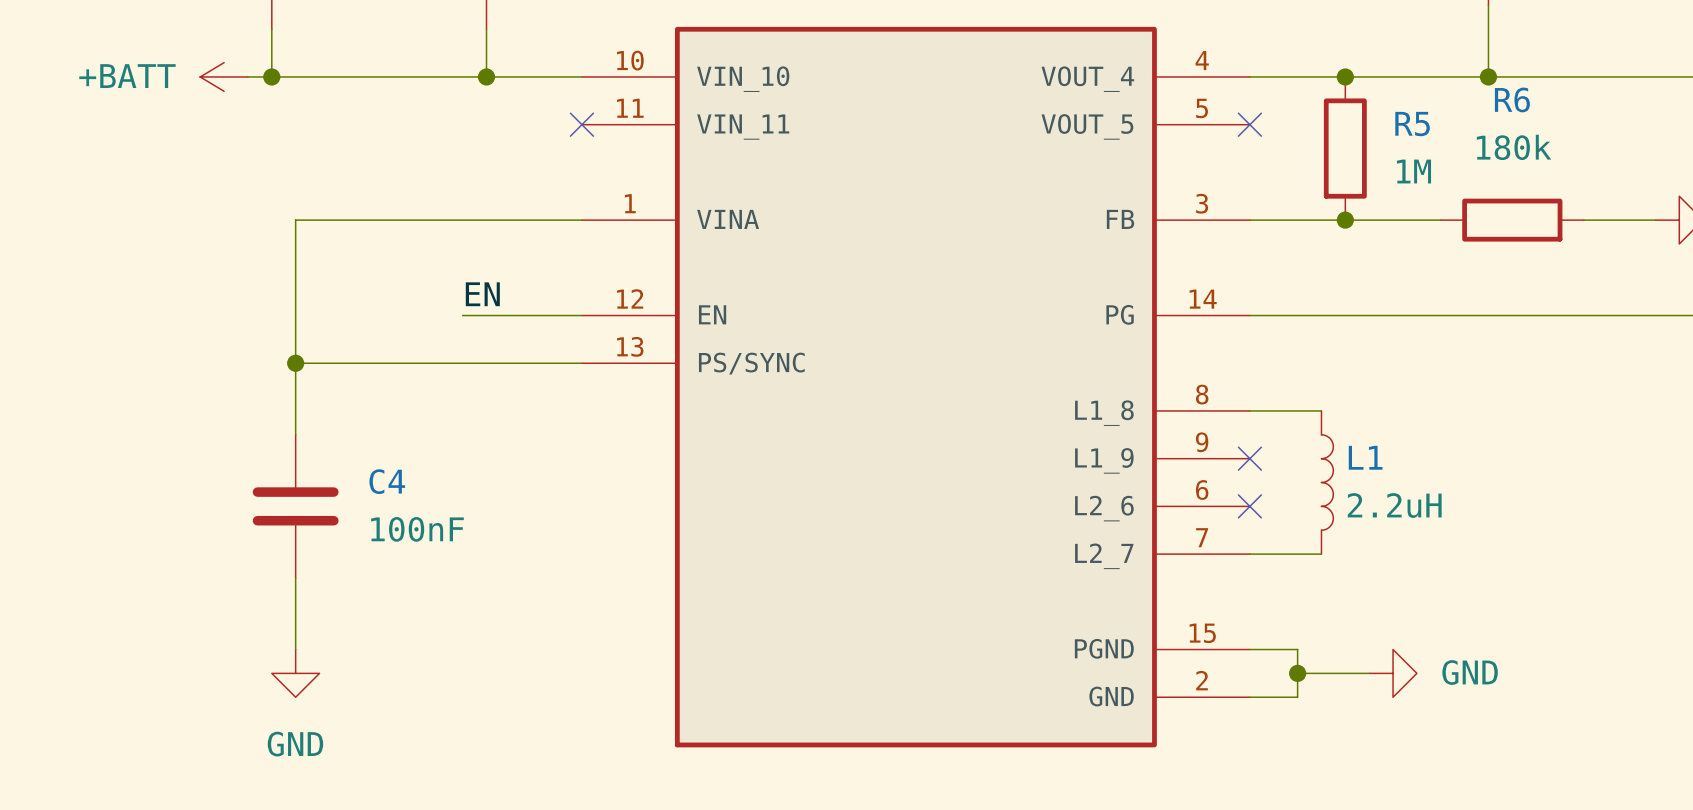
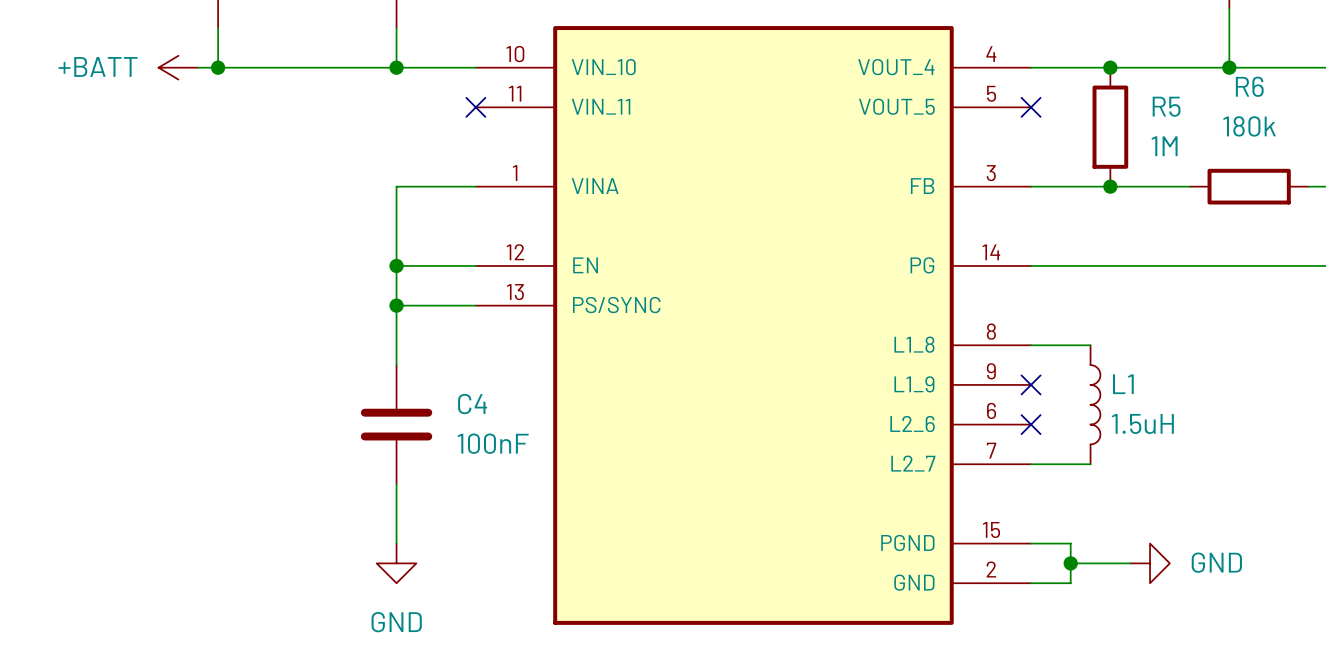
wire: (486, 220) (295, 220) (295, 434) -> (396, 186) (396, 365)
label: EN (482, 294) -> none
wire: (462, 315) (486, 315) -> none
junction: none -> (396, 265)
wire: (295, 363) (486, 363) -> none
junction: (295, 363) -> none
junction: none -> (396, 305)
L1 value: 2.2uH (1394, 505) -> 1.5uH (1142, 423)
C4 position: (295, 506) -> (396, 424)
wire: (295, 577) (295, 649) -> (396, 484) (396, 543)
power symbol position: GND (295, 673) -> GND (396, 563)

